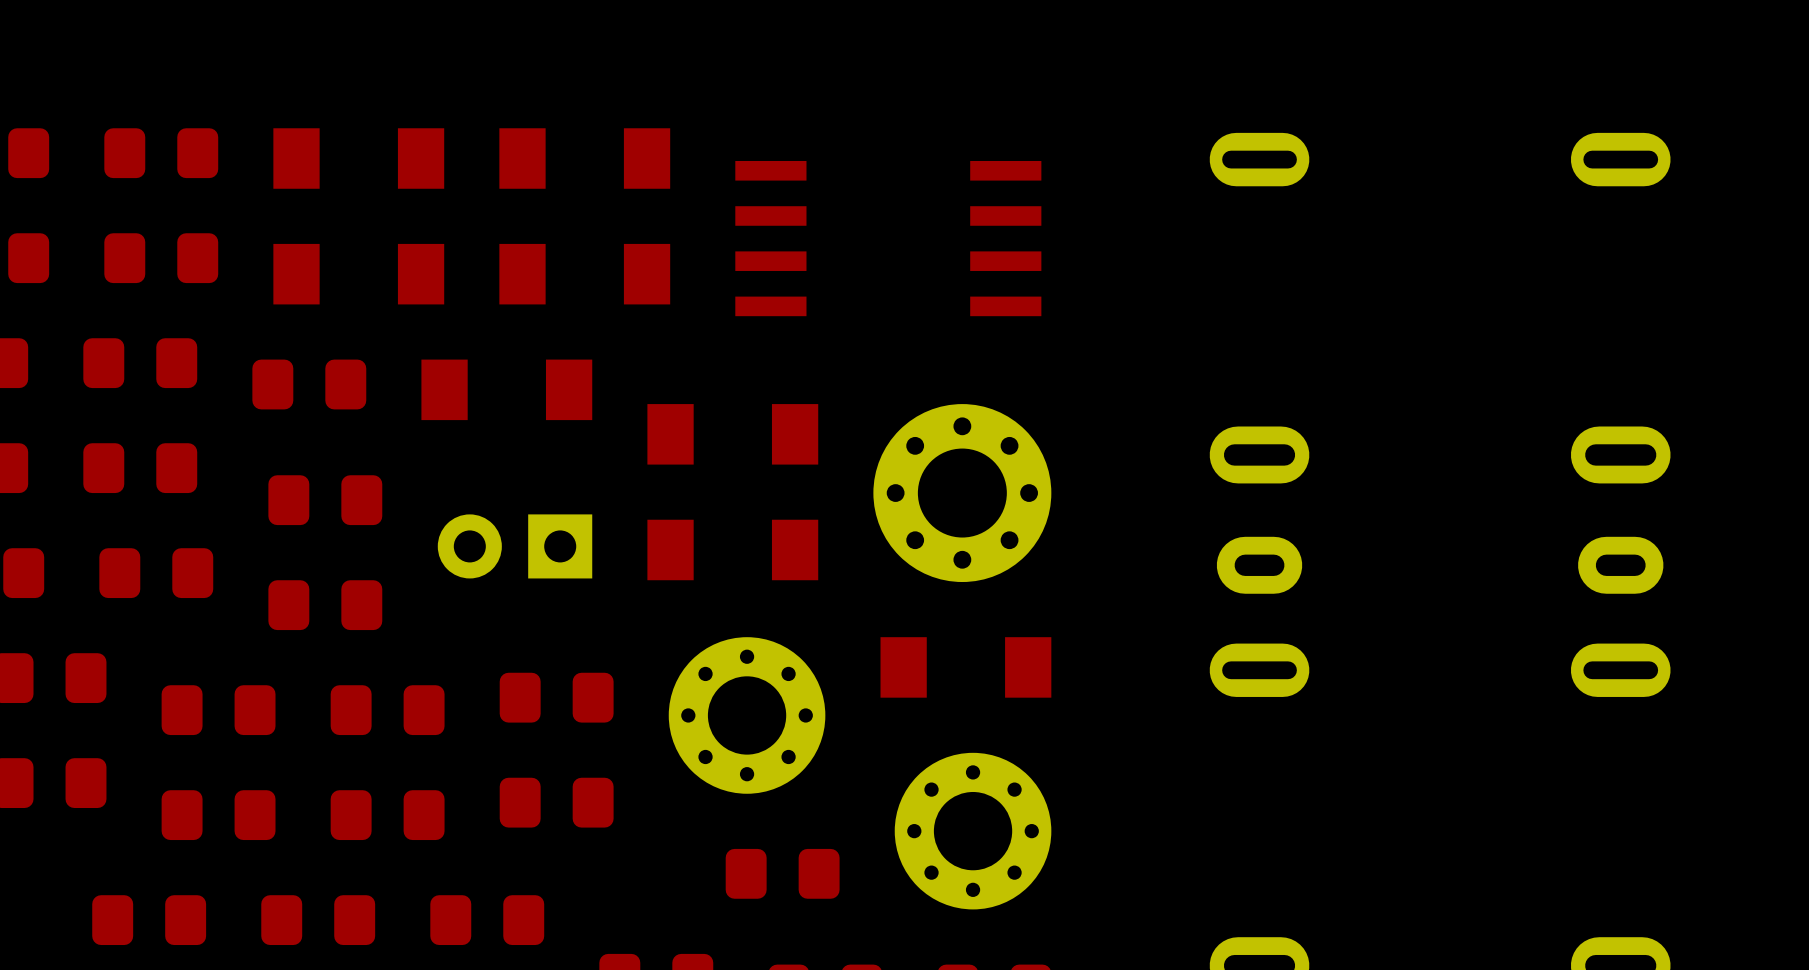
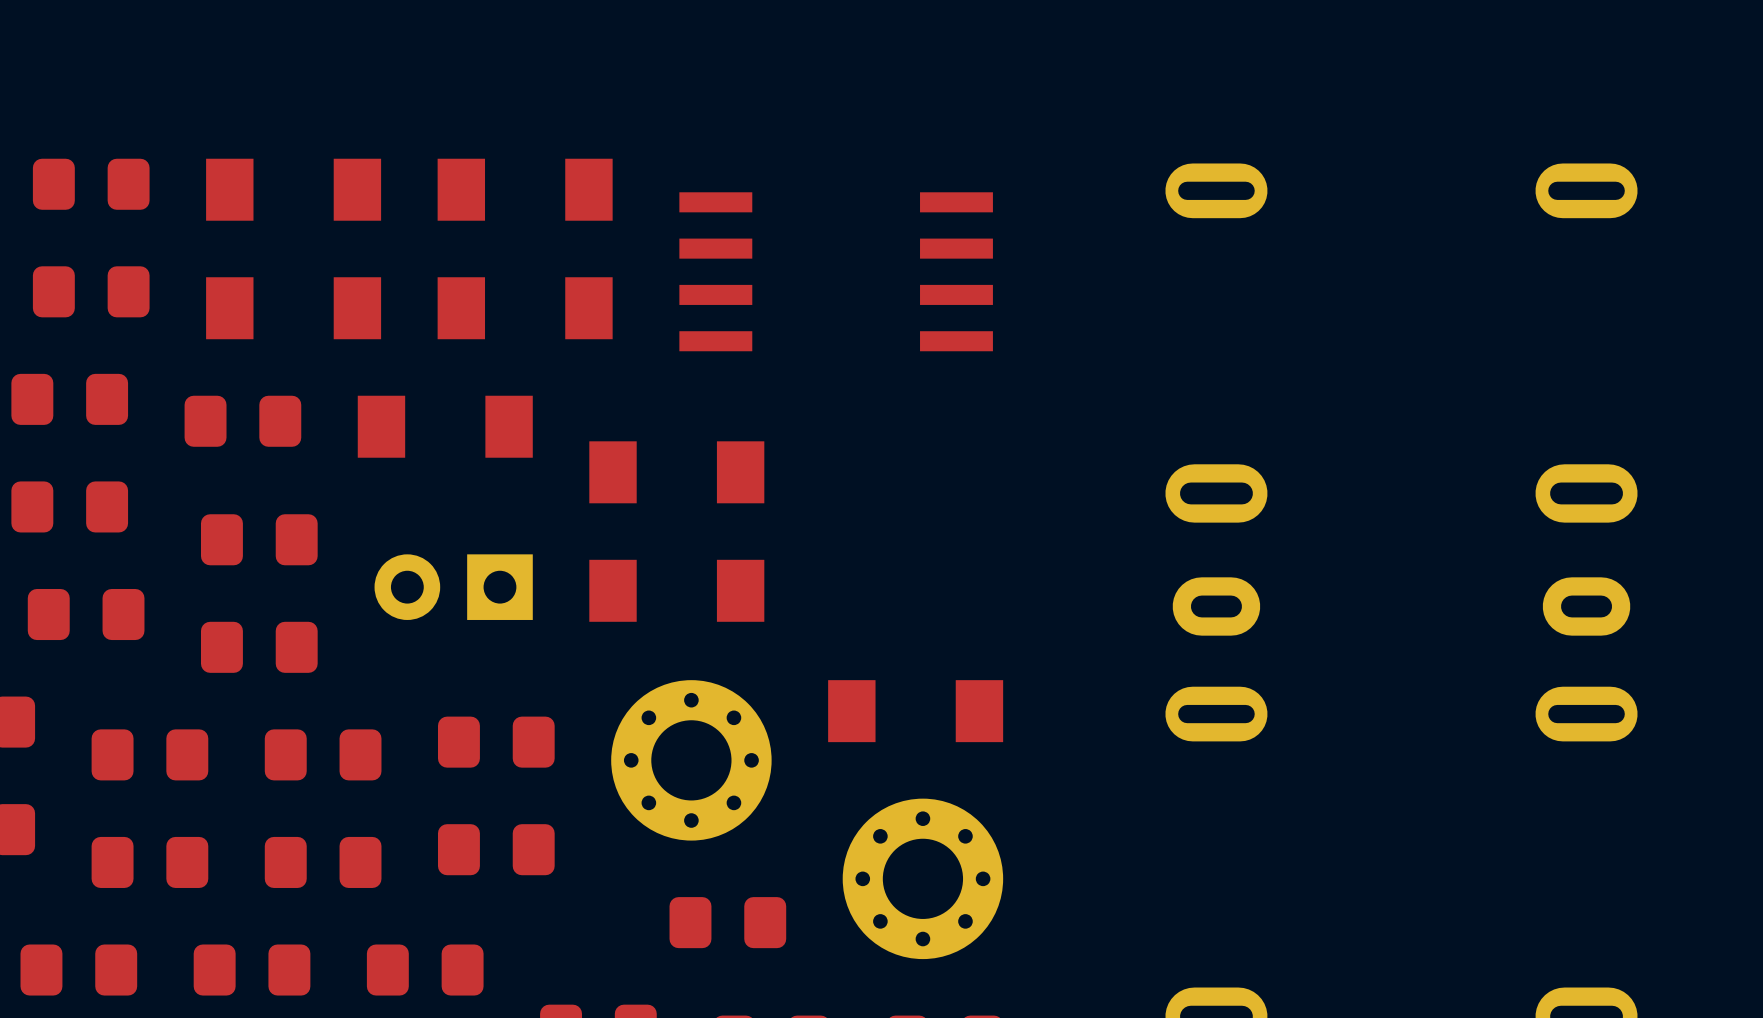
part: (962, 493) -> none

